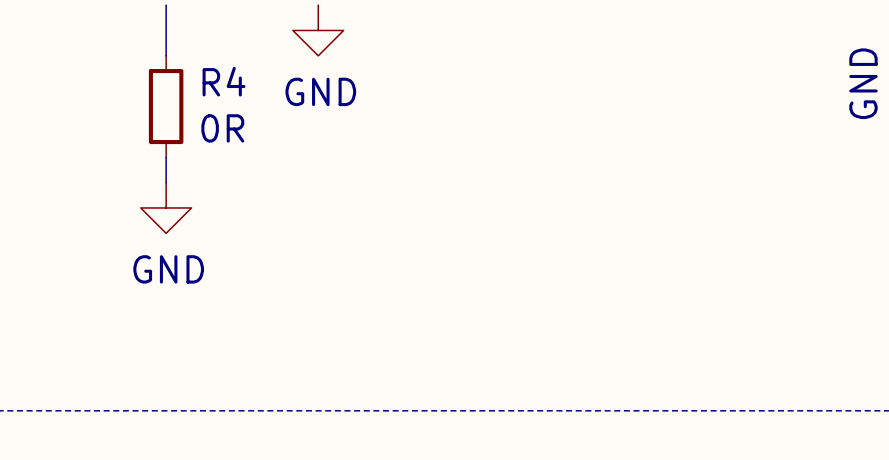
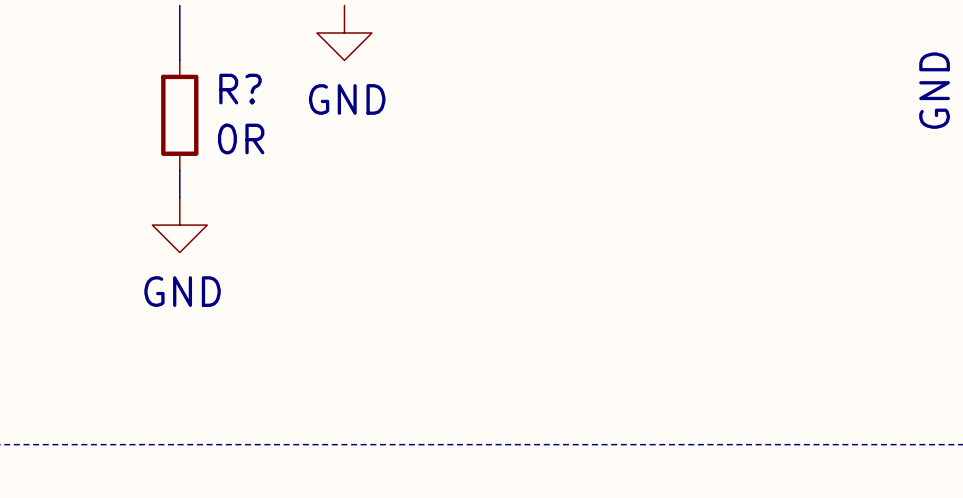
R4 name: R4 (224, 81) -> R? (240, 89)

